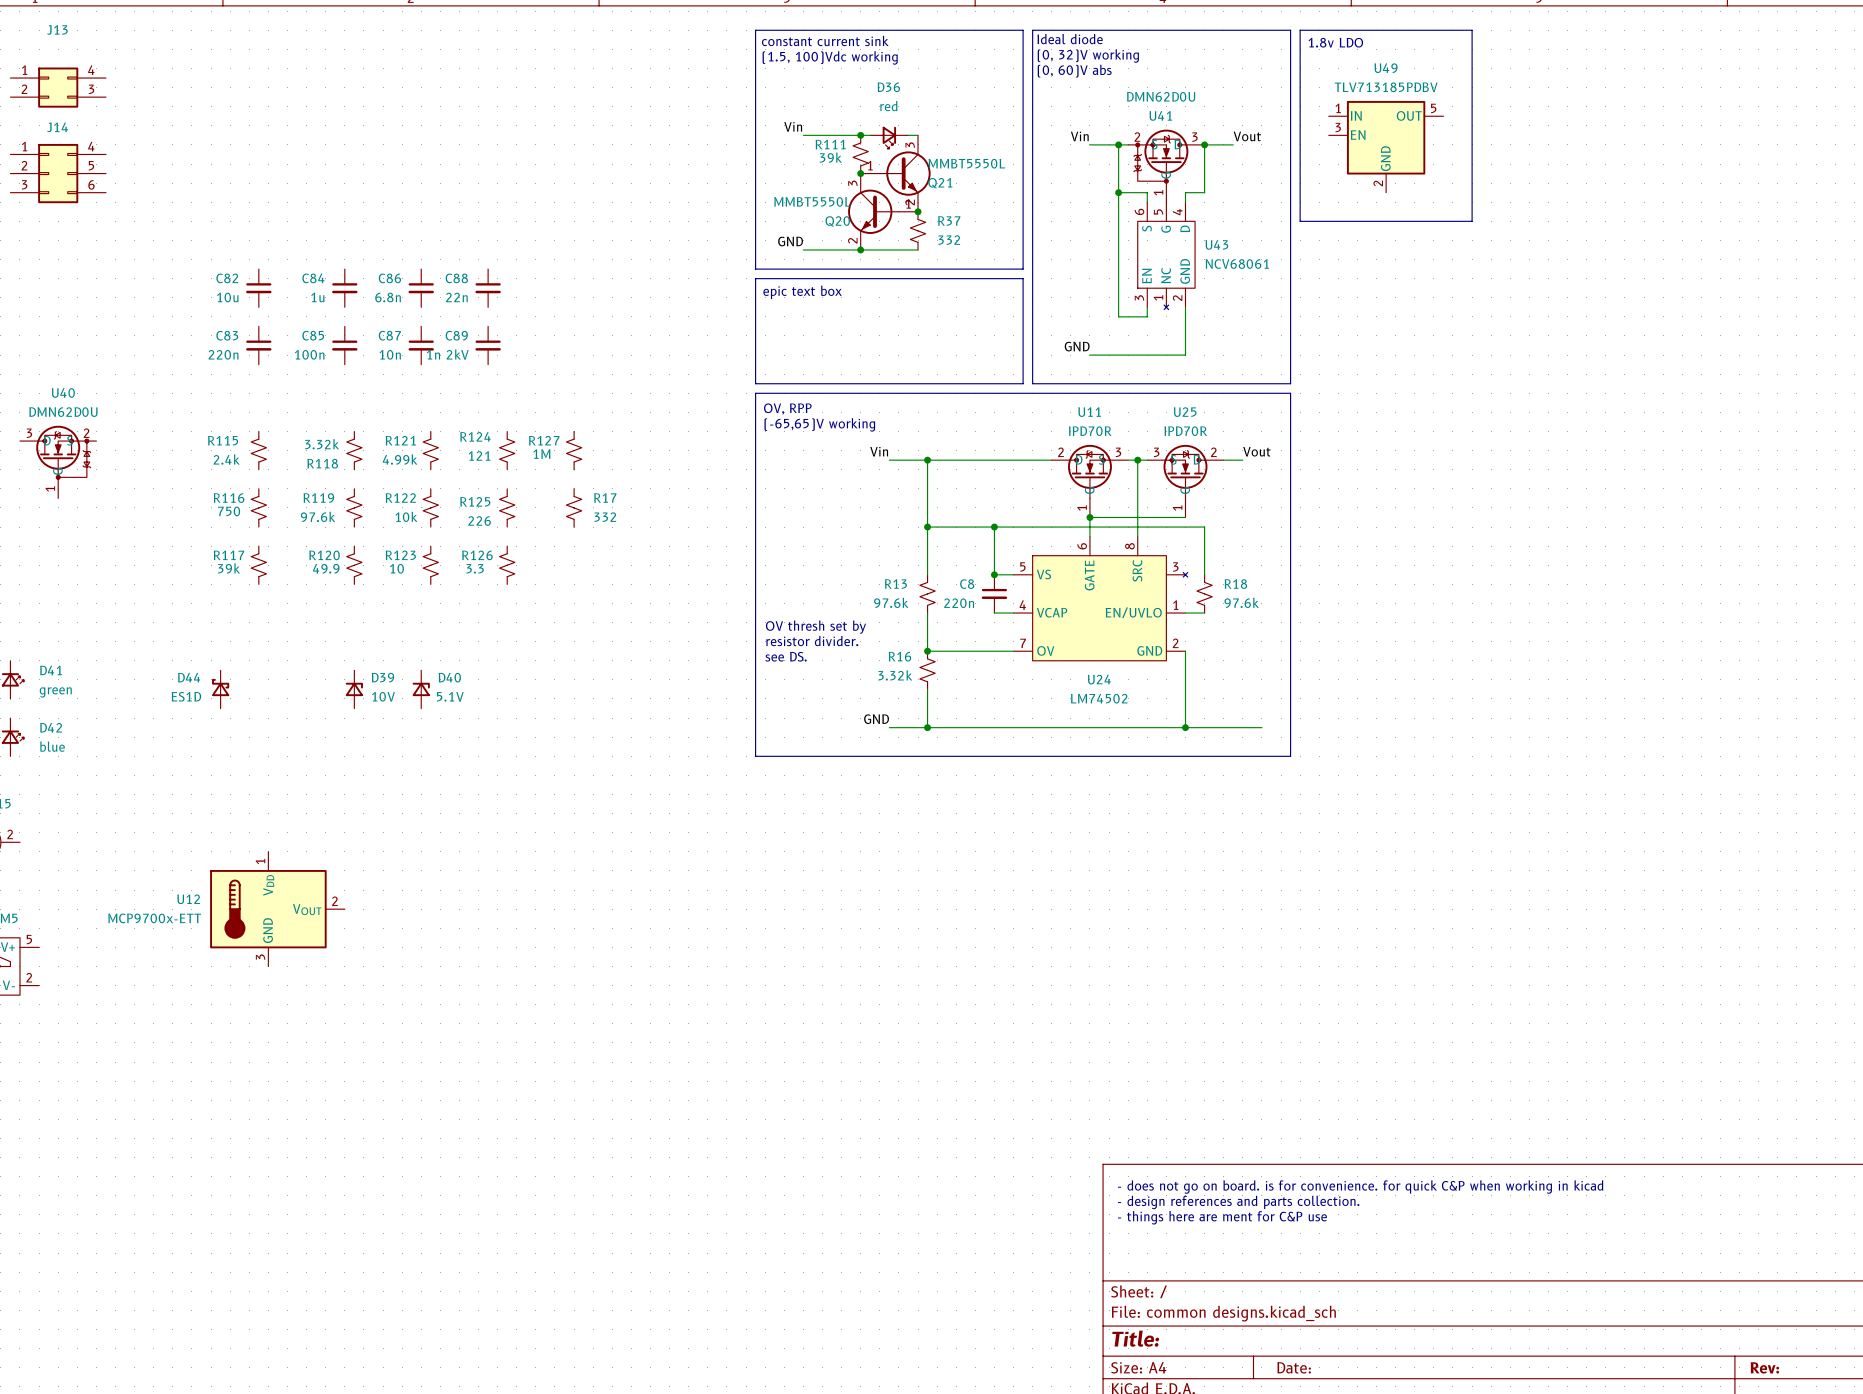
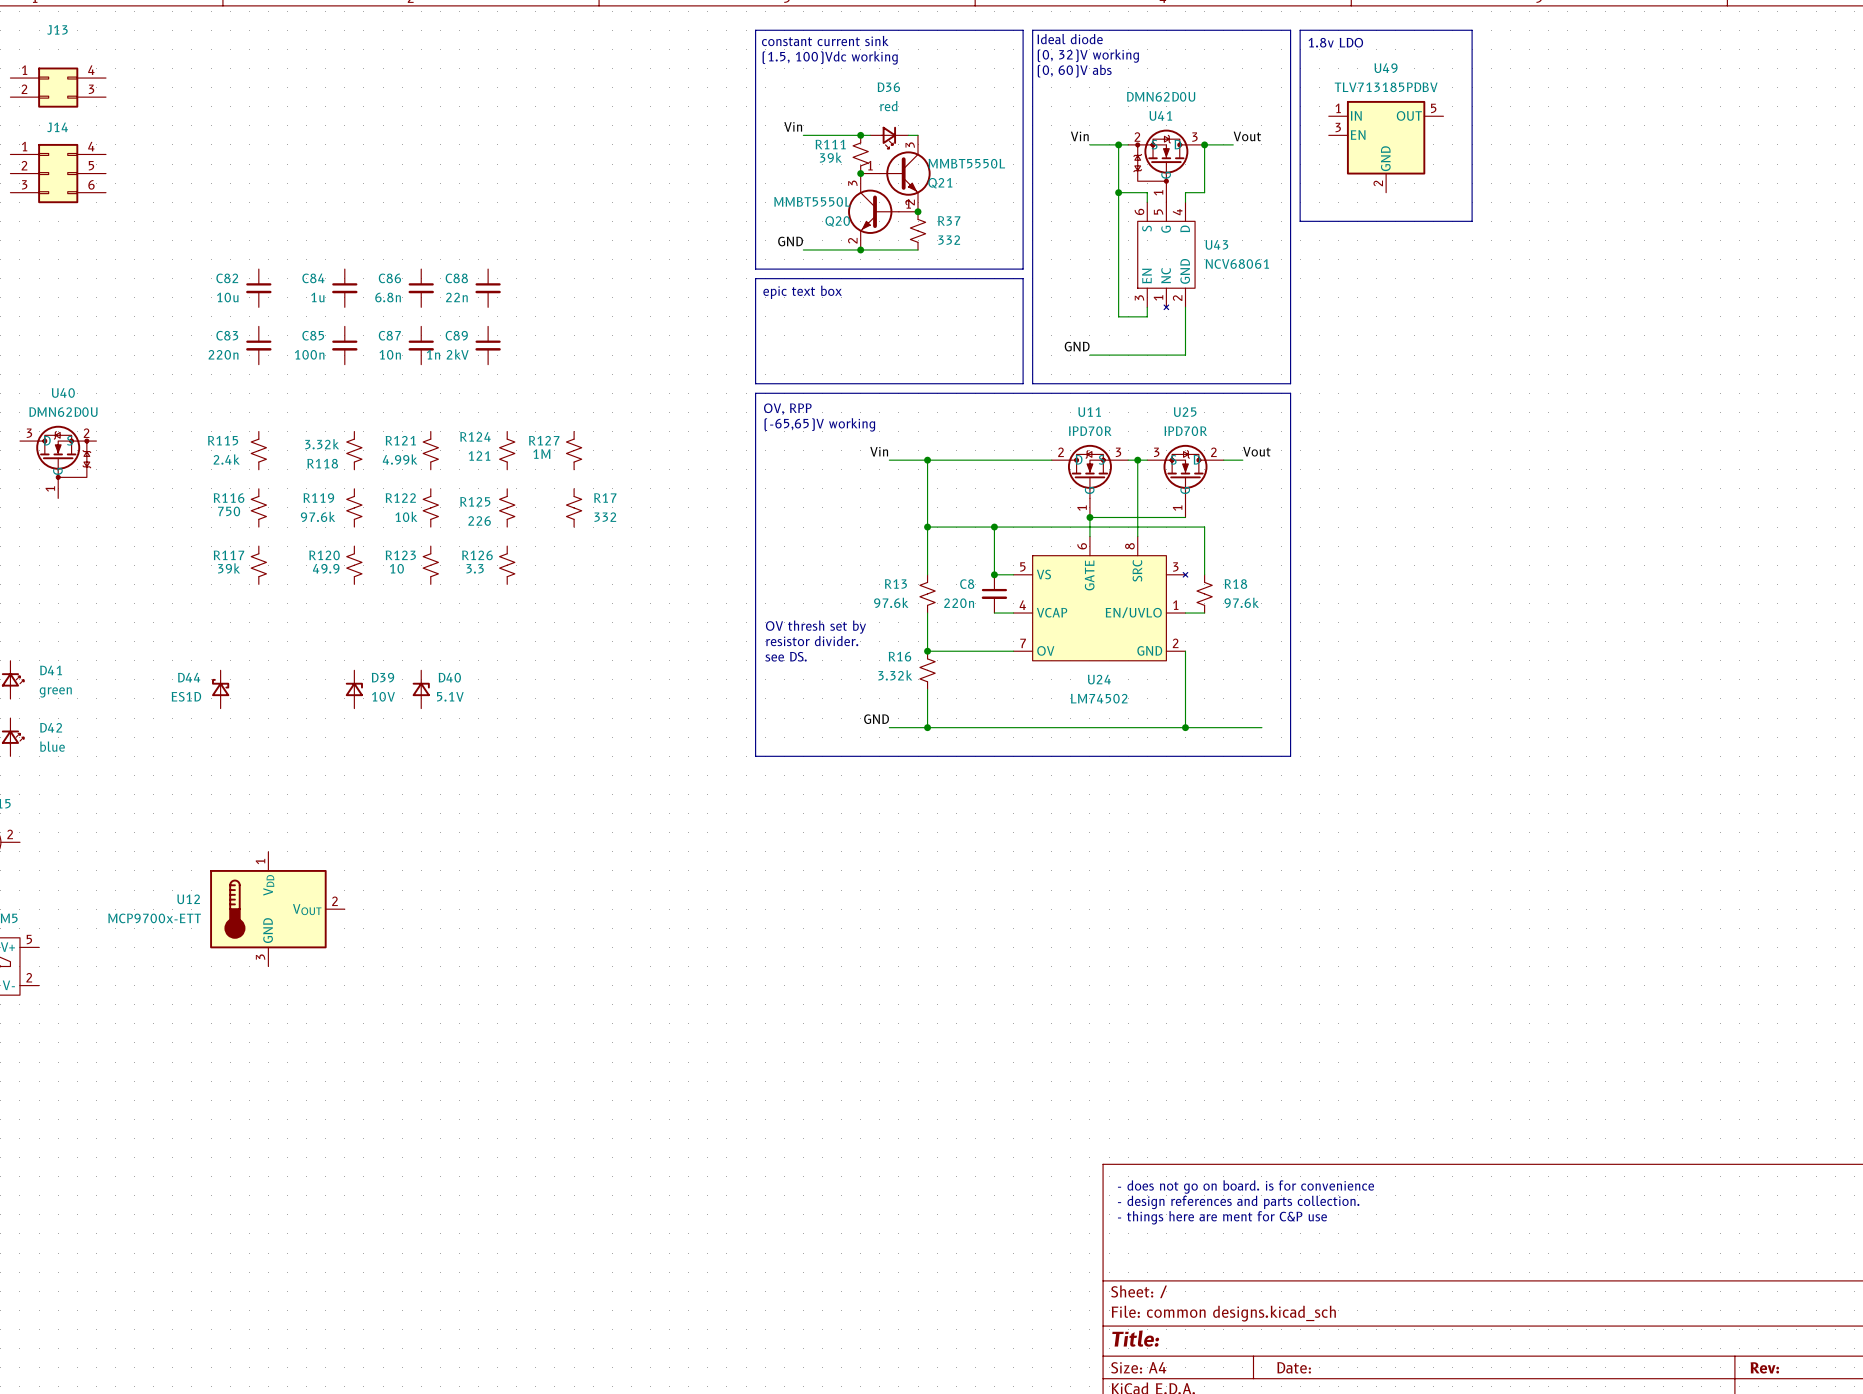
text: - does not go on board. is for convenience. for quick C&P when working in kicad (1360, 1187) -> - does not go on board. is for convenience (1245, 1187)

